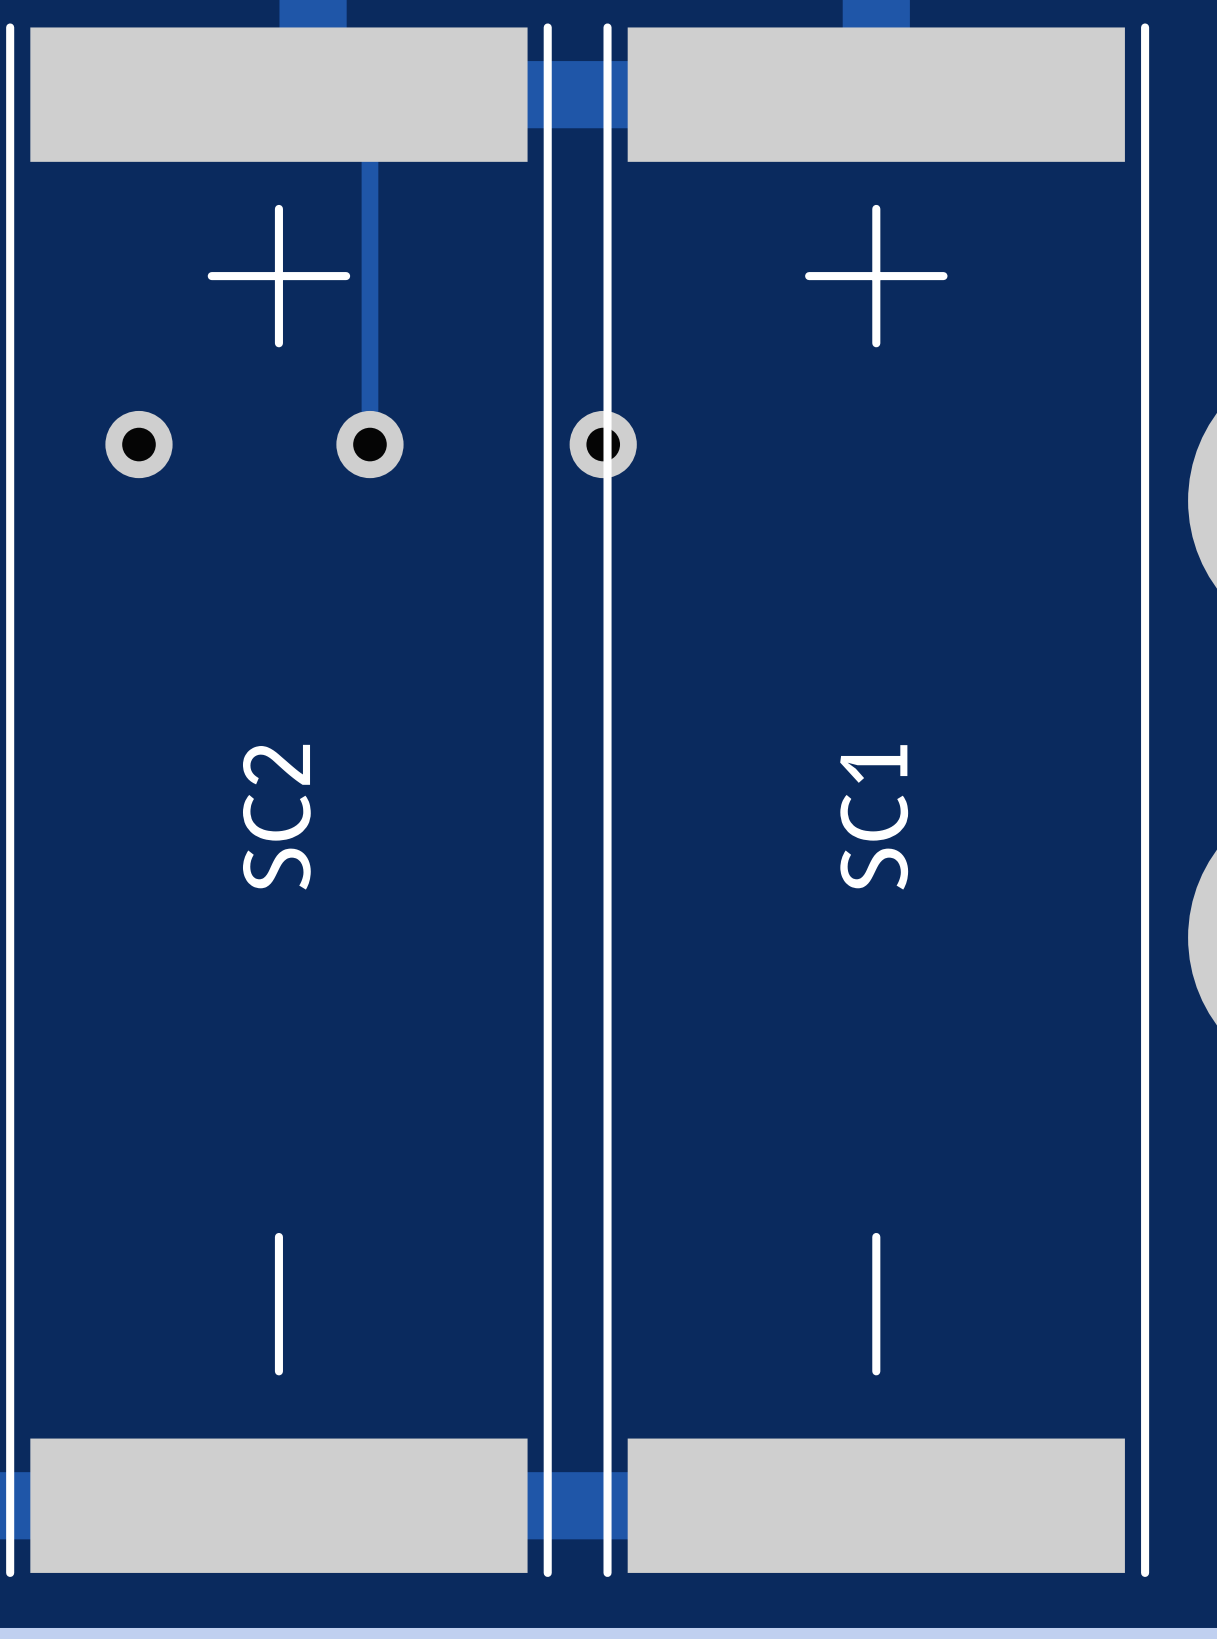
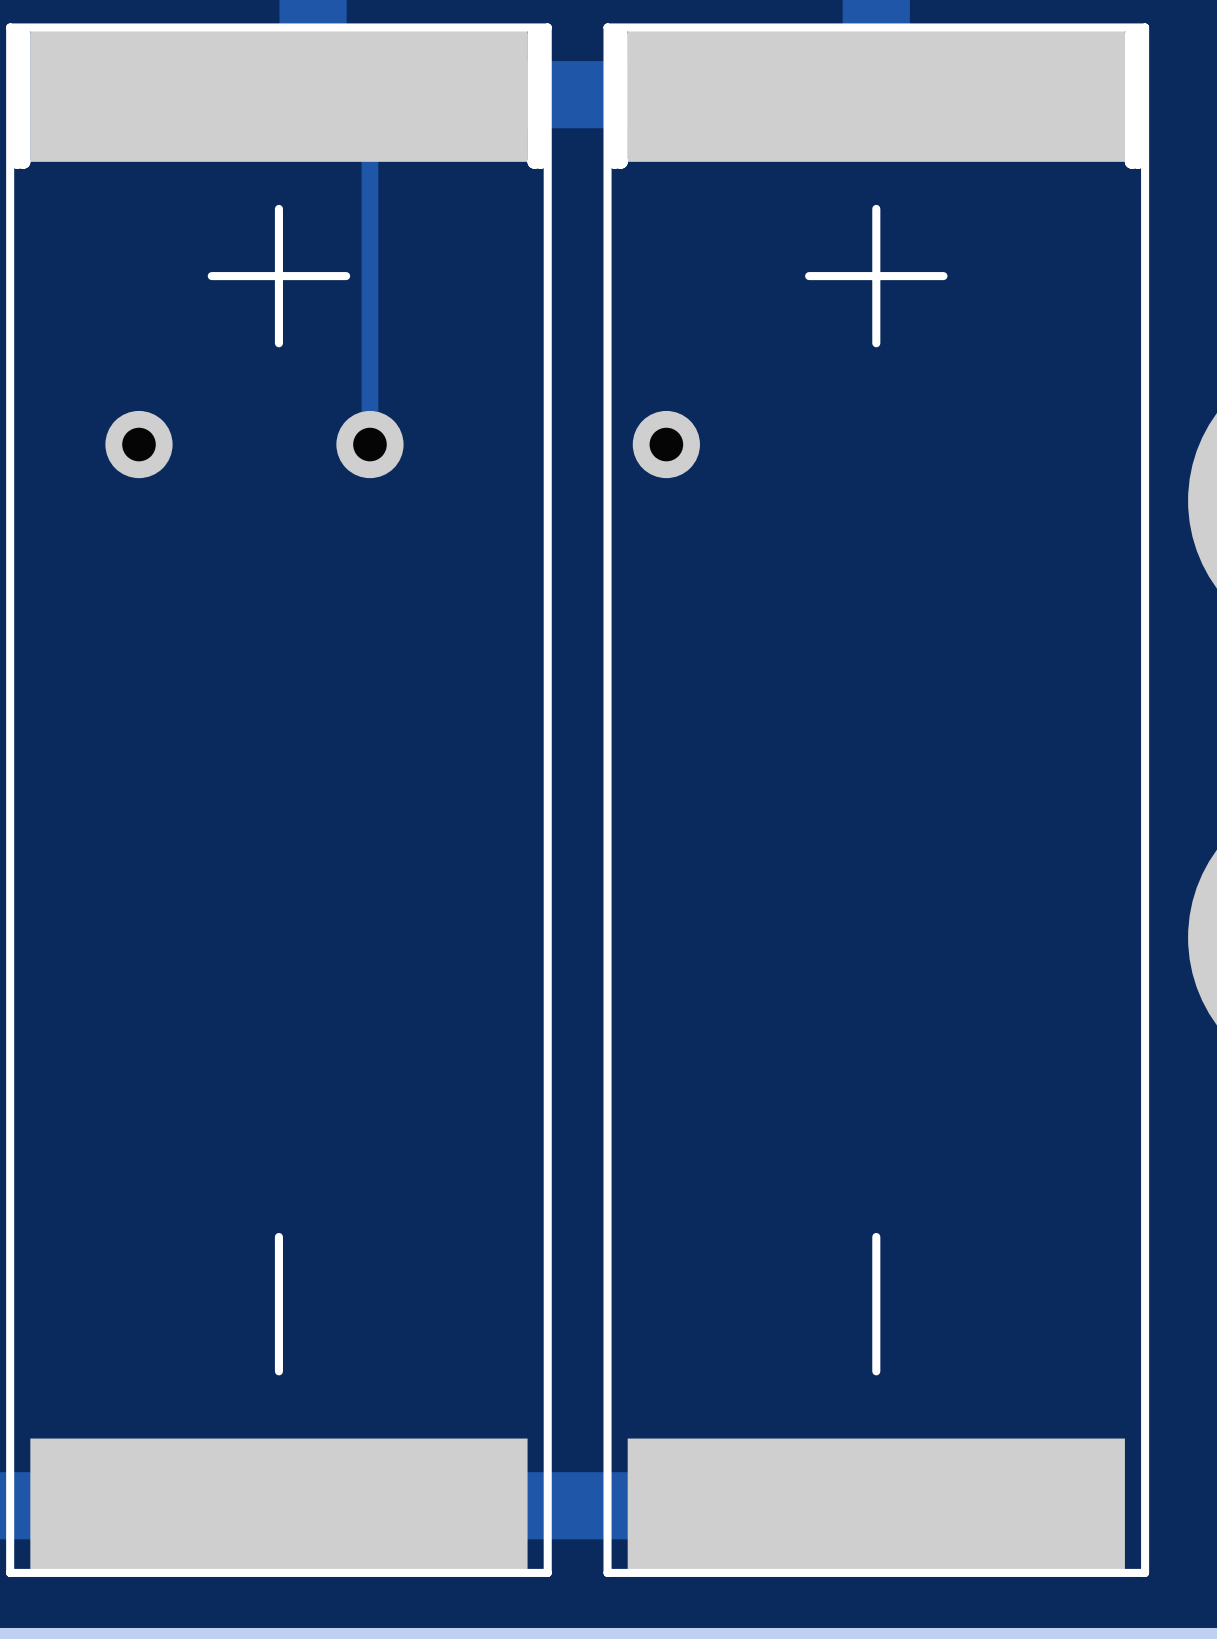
part position: (603, 444) -> (666, 444)
SC2: (278, 800) -> none
part: none -> (278, 800)
SC1: (876, 800) -> none
part: none -> (876, 800)

